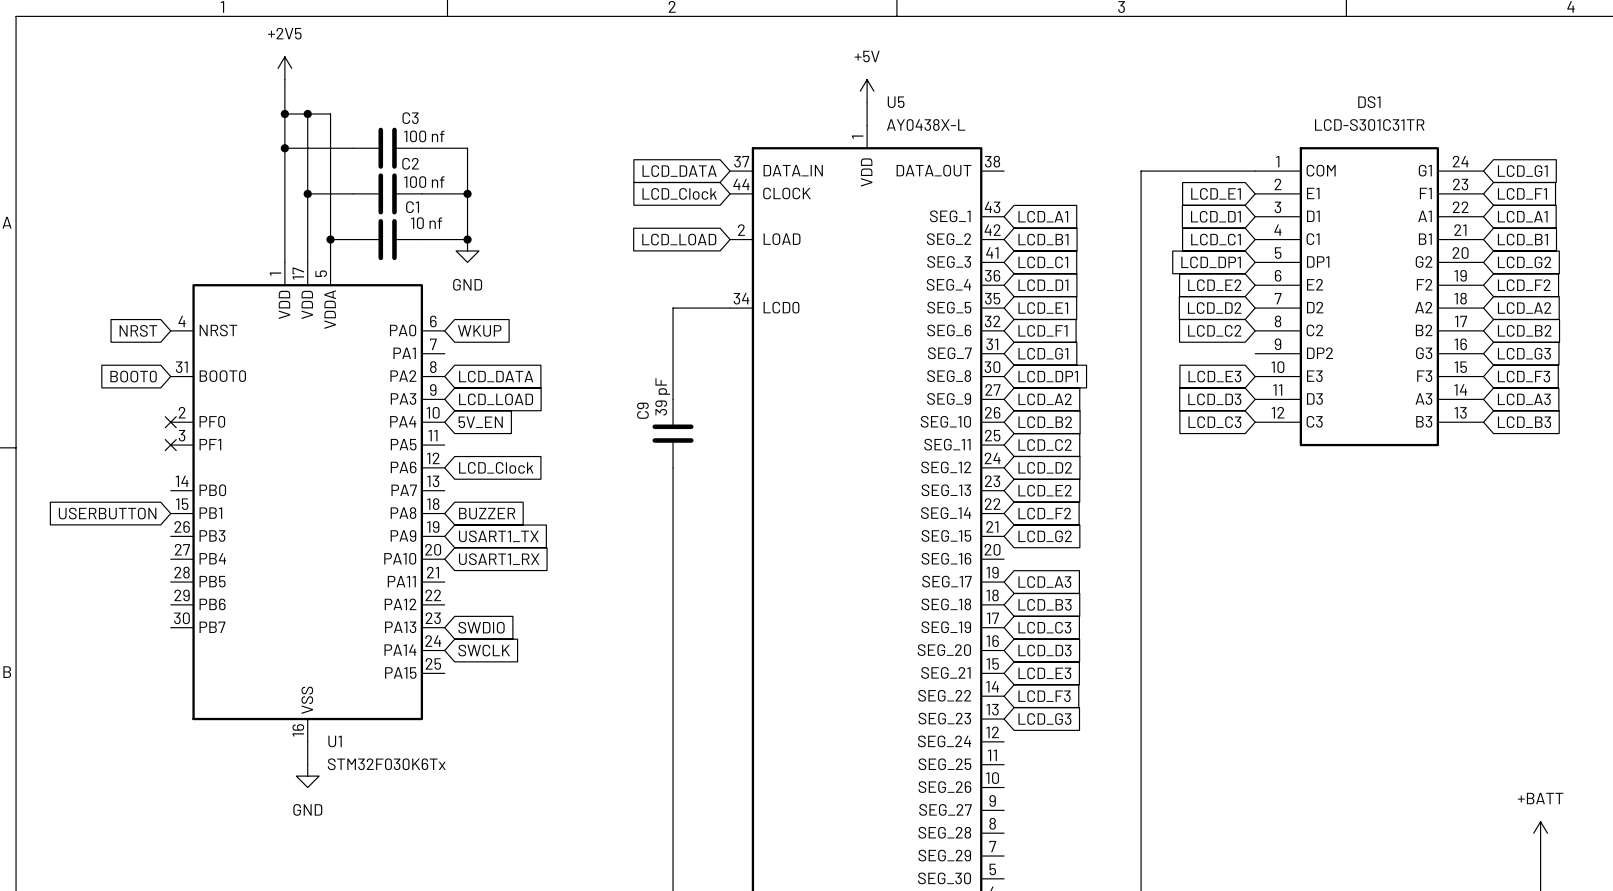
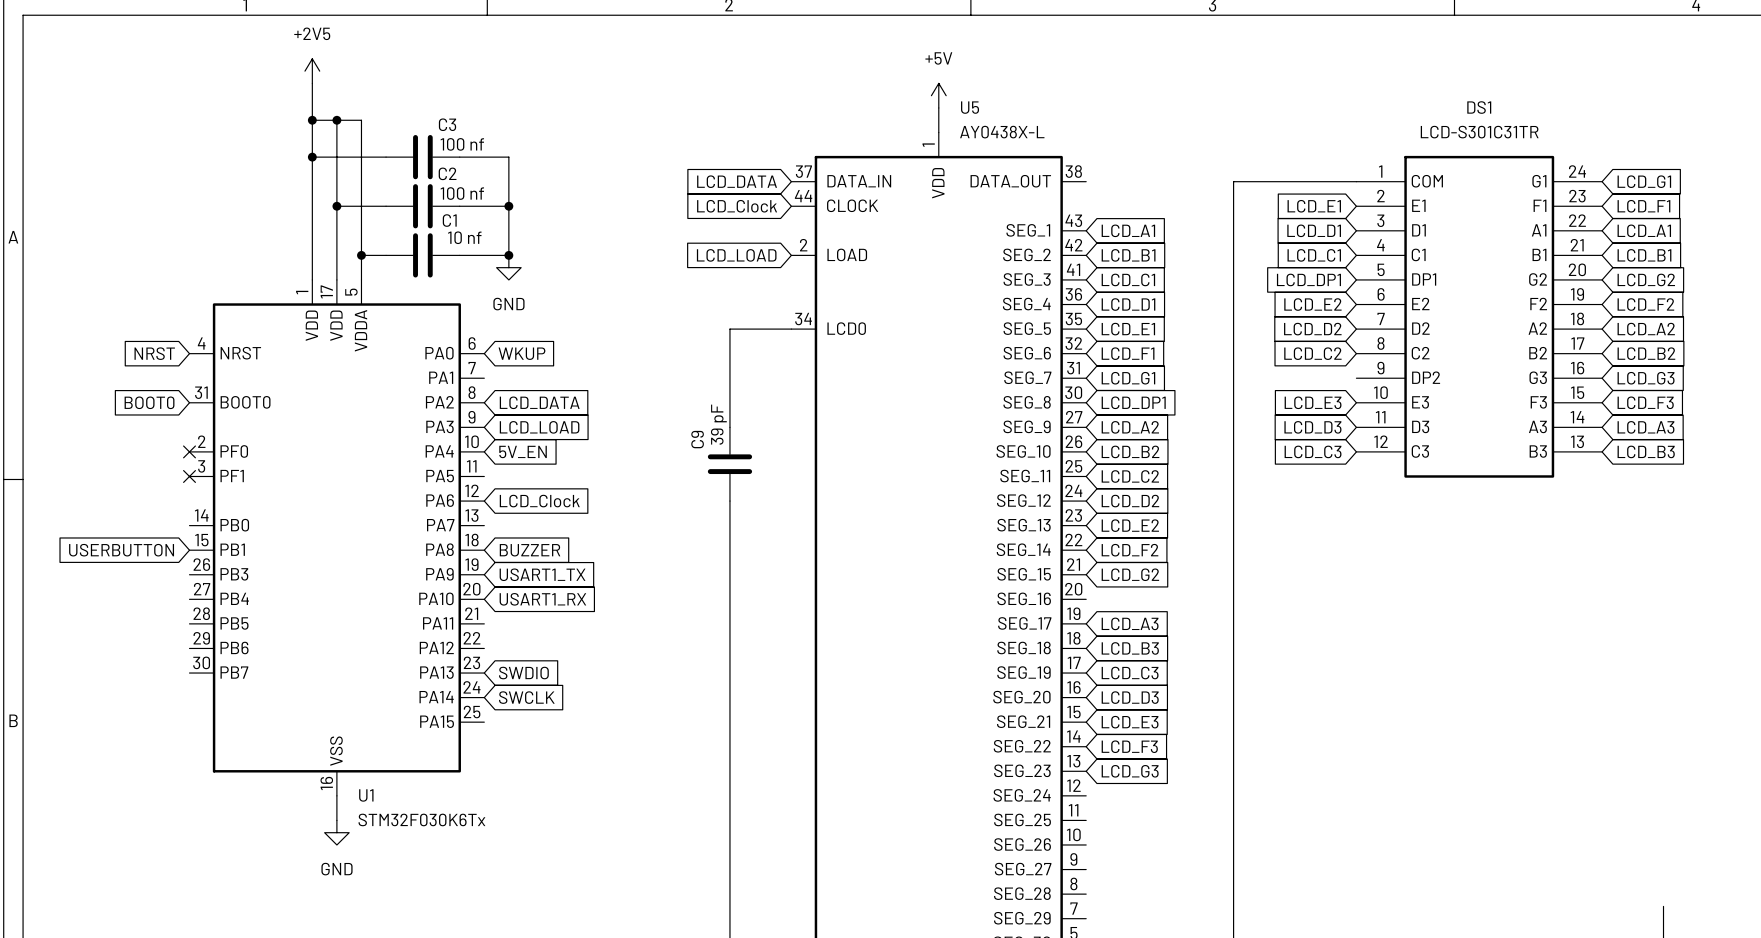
power symbol: +BATT (1540, 833) -> none

